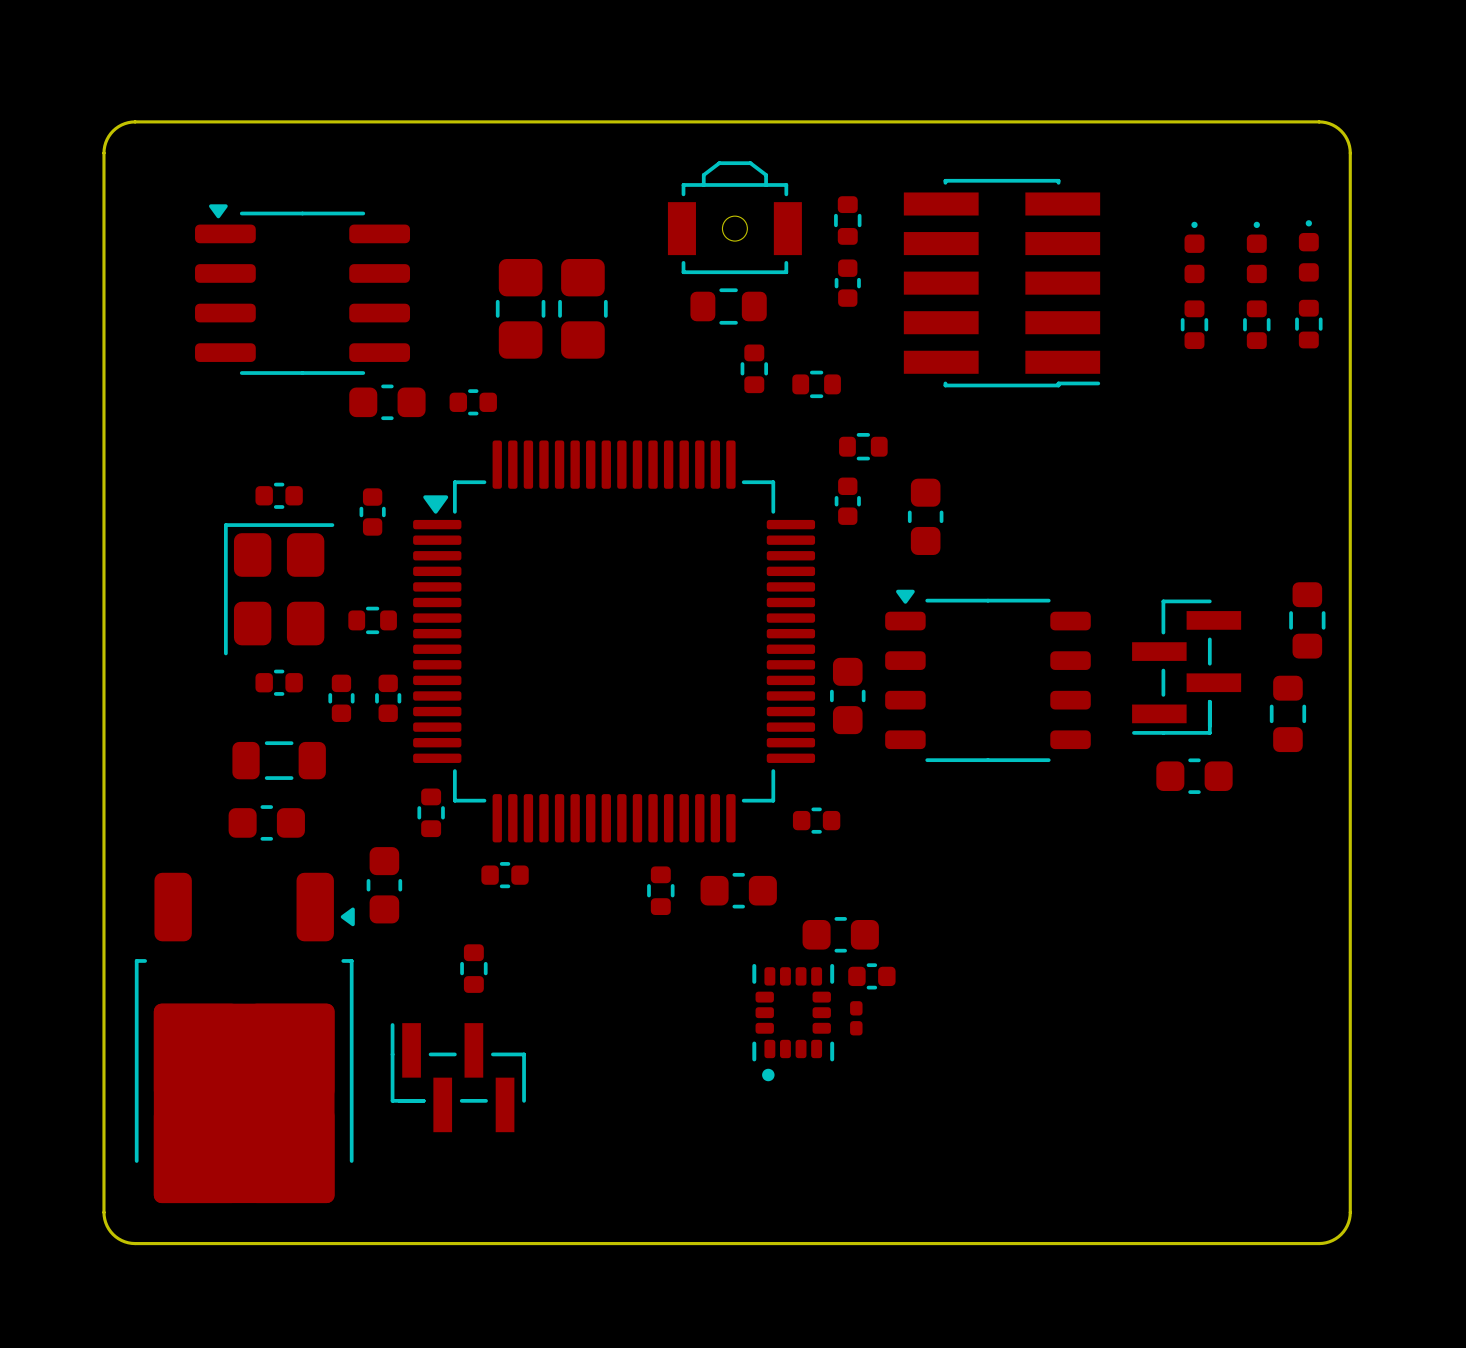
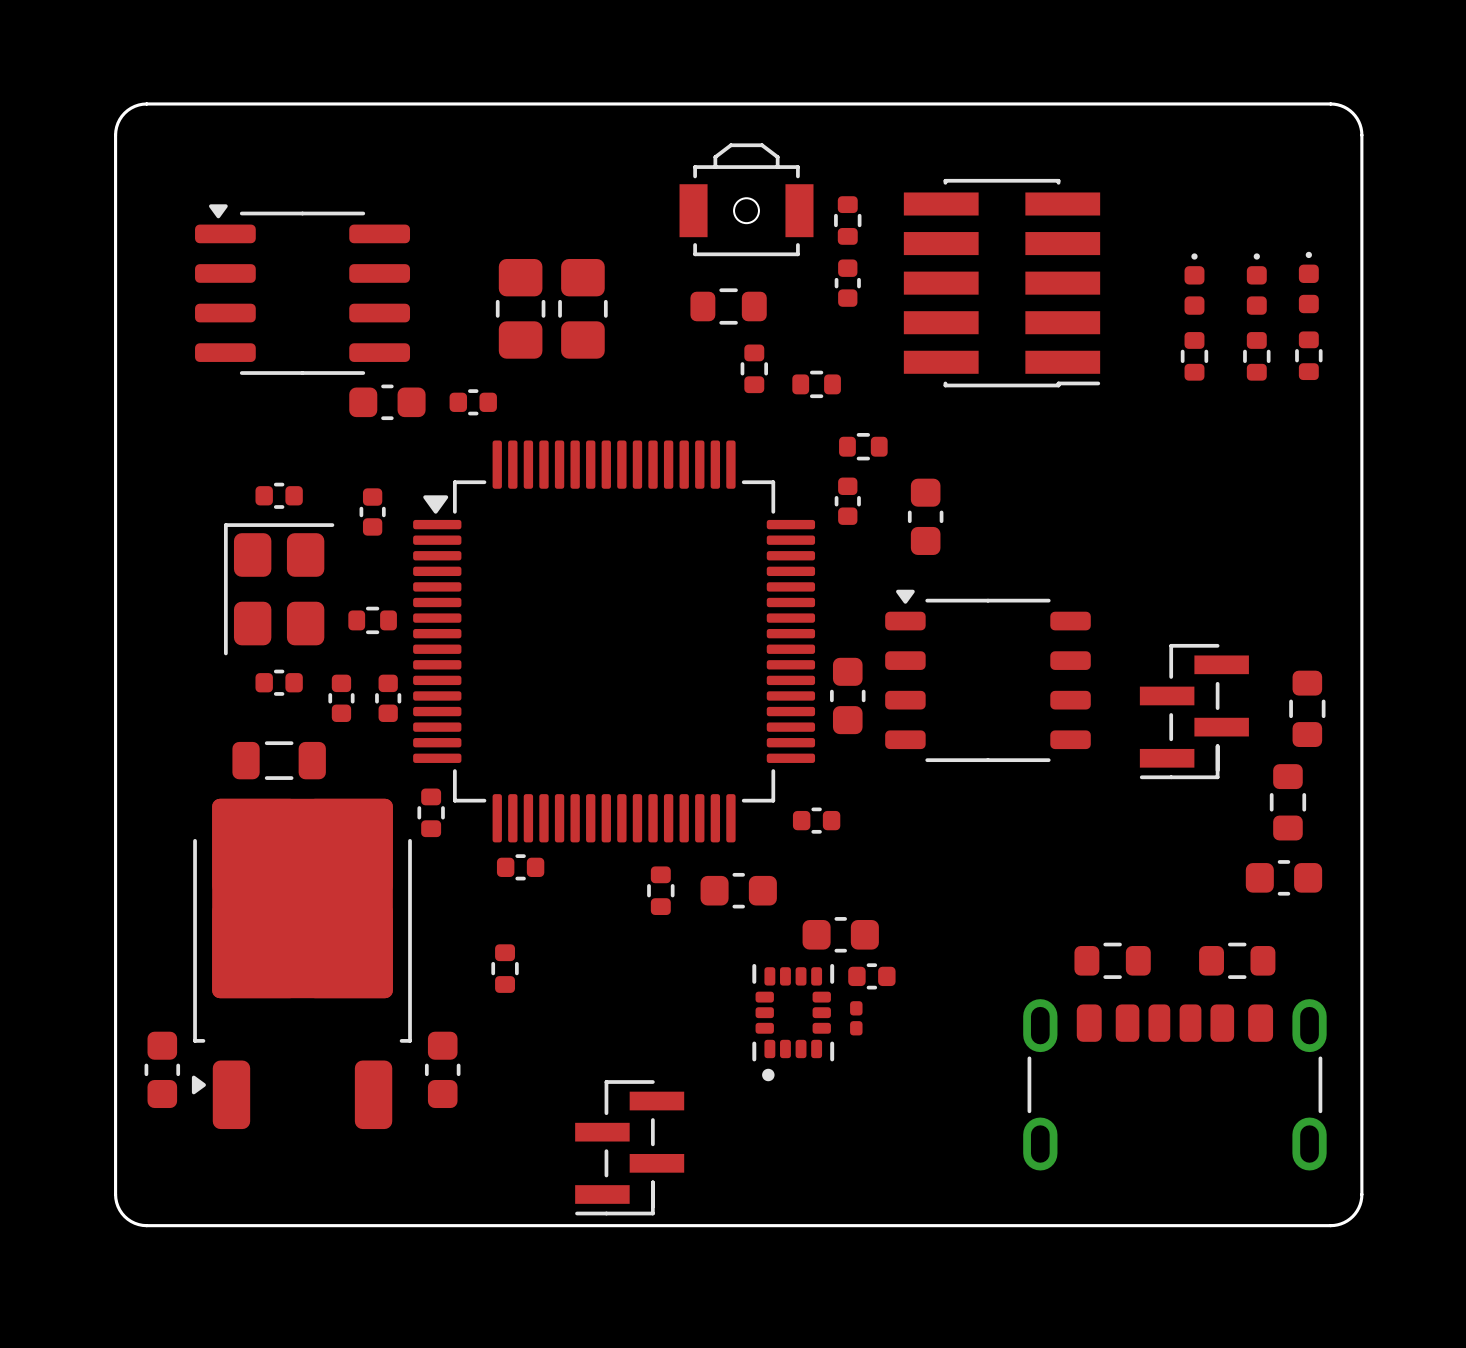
board edge: (135, 121) (1319, 121) (1329, 123) (1341, 131) (1348, 142) (1350, 153) (1350, 1212) (1348, 1222) (1341, 1234) (1329, 1241) (1319, 1243) (135, 1243) (121, 1240) (113, 1234) (105, 1222) (103, 1212) (103, 153) (107, 139) (113, 131) (124, 123) (135, 121) -> (146, 103) (134, 106) (124, 113) (117, 123) (115, 135) (115, 1194) (117, 1206) (124, 1216) (134, 1223) (146, 1225) (1330, 1225) (1341, 1223) (1352, 1216) (1358, 1208) (1361, 1194) (1361, 135) (1358, 121) (1352, 113) (1341, 105) (1330, 103) (146, 103)
part position: (734, 217) -> (746, 199)
part: (1308, 250) -> none
part position: (1194, 252) -> (1194, 284)
part: (1256, 252) -> none
part: none -> (1308, 282)
part: none -> (1256, 284)
part position: (1194, 324) -> (1194, 356)
part: (1256, 324) -> none
part: (1308, 324) -> none
part: none -> (1308, 355)
part: none -> (1256, 356)
part: (1307, 620) -> none
part position: (1186, 667) -> (1194, 711)
part position: (1287, 713) -> (1307, 708)
part position: (1194, 776) -> (1283, 877)
part: none -> (1287, 802)
part: (266, 822) -> none
part position: (505, 875) -> (520, 867)
part: (384, 885) -> none
part: none -> (1112, 960)
part: none -> (1237, 960)
part position: (473, 968) -> (505, 968)
part footprint: [390, 1023, 526, 1133] -> [424, 1031, 461, 1109]
part rotation: 0° (244, 1037) -> 180° (301, 963)
part: none -> (162, 1069)
part: none -> (1174, 1084)
part: none -> (629, 1147)

